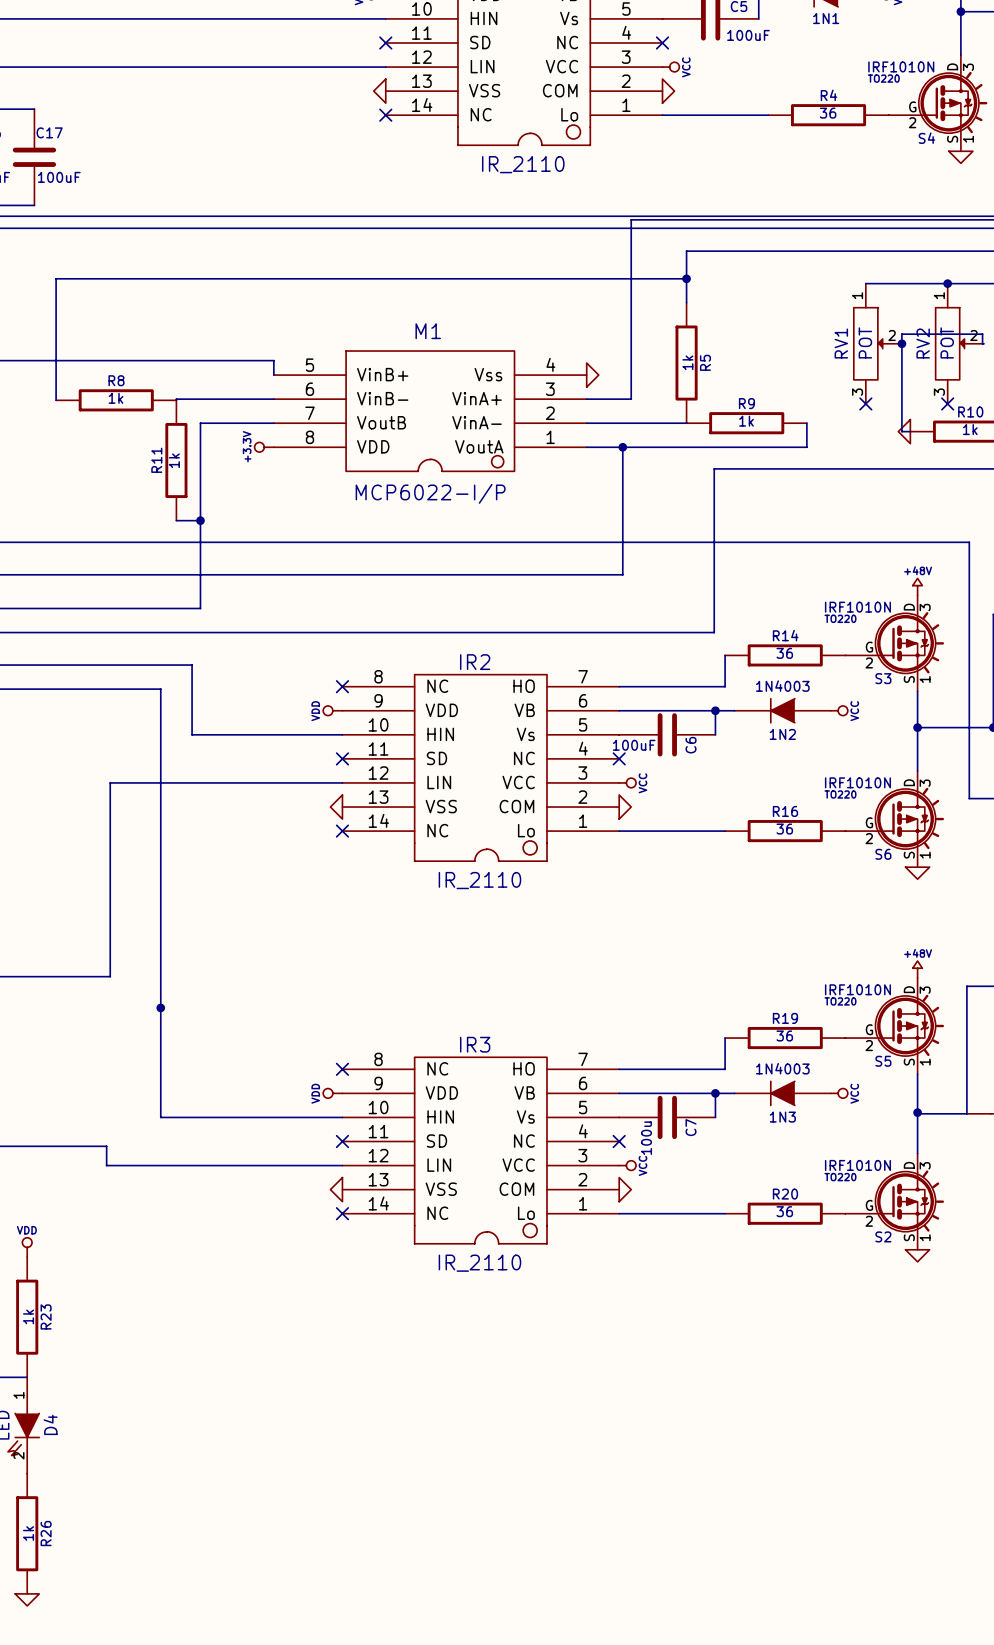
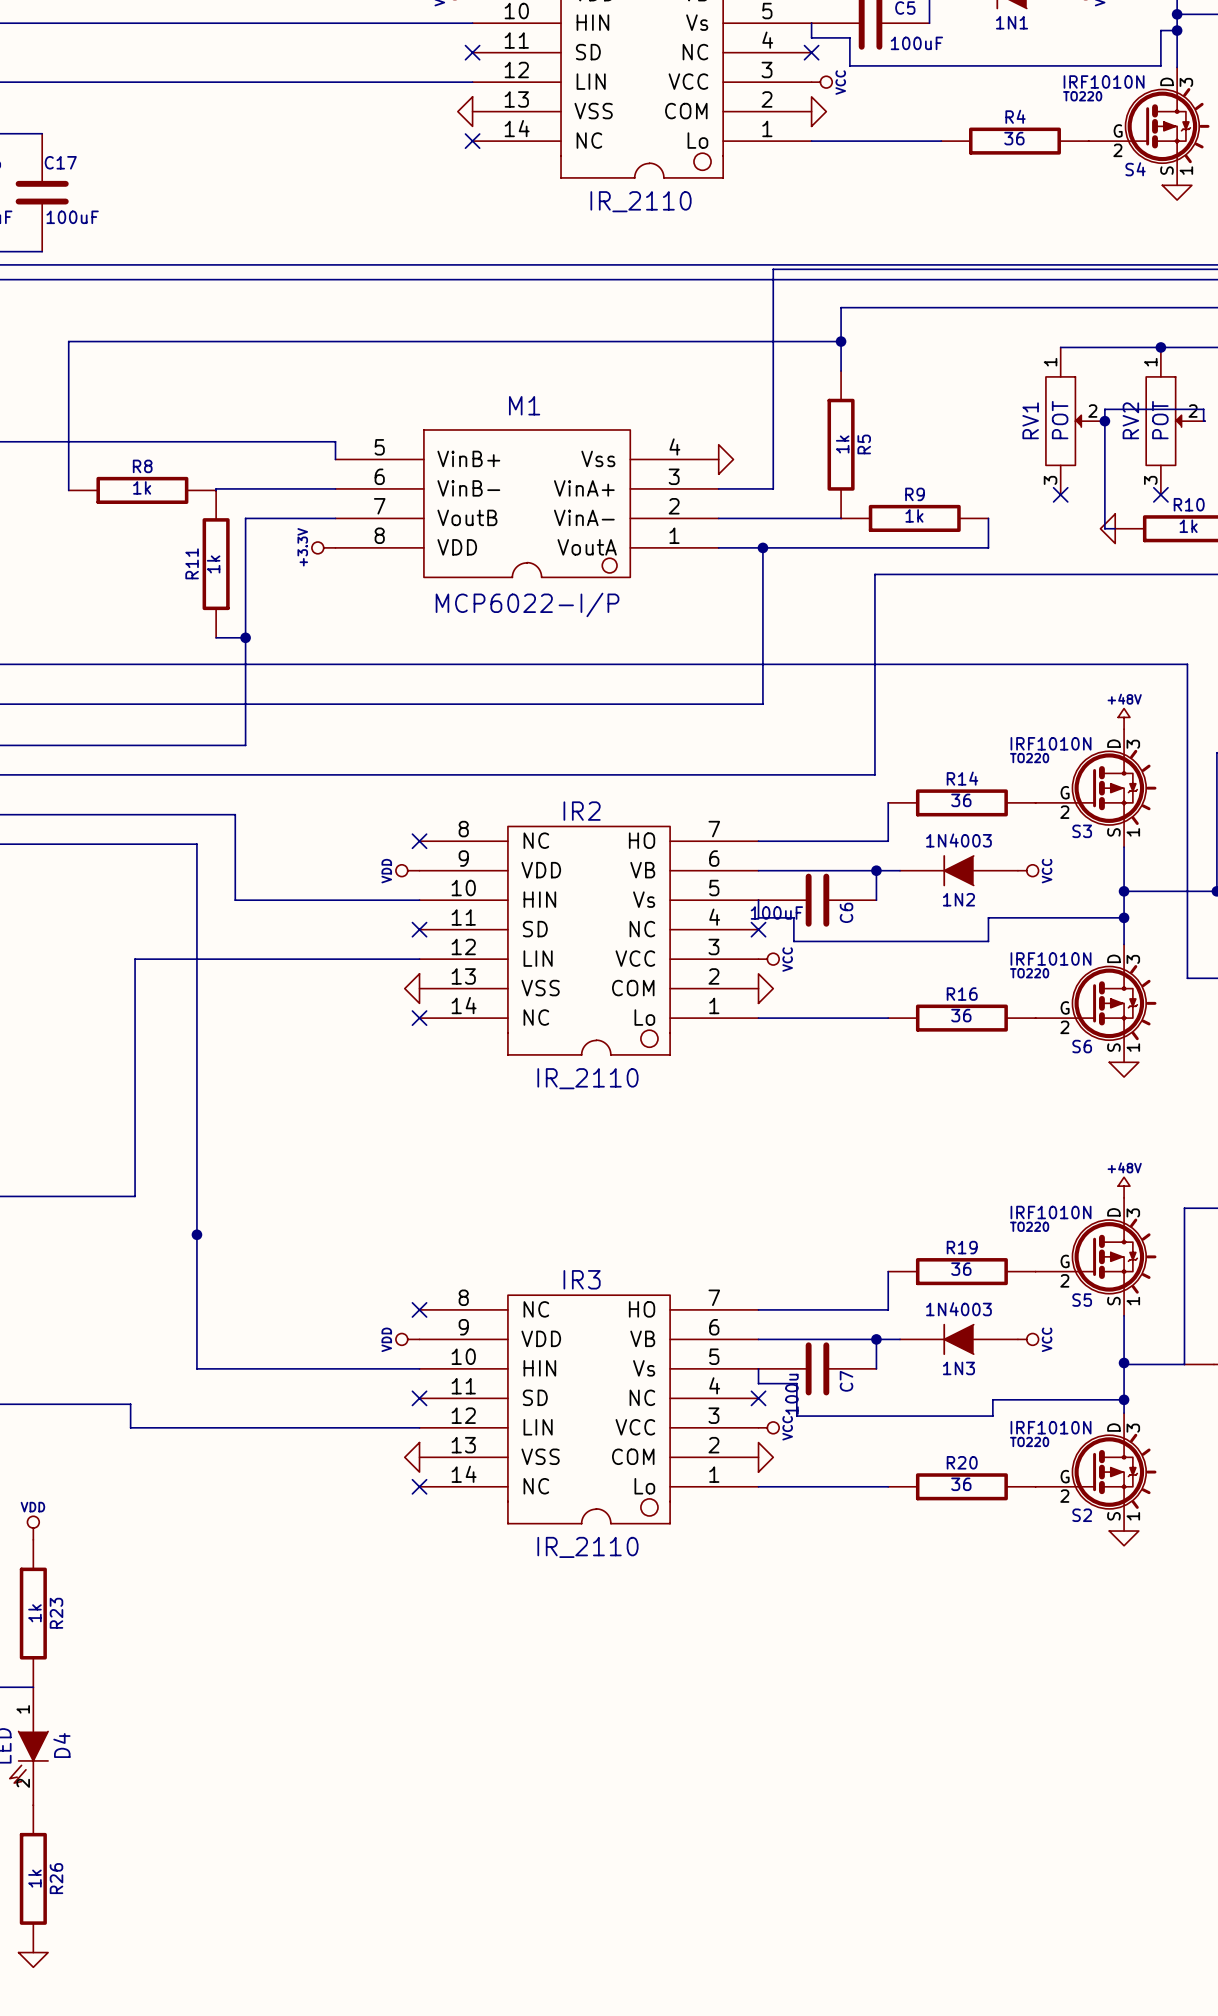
wire: none -> (811, 23) (811, 37) (849, 37) (849, 65) (1160, 65) (1160, 30) (1177, 30)
junction: none -> (1177, 30)
wire: none -> (758, 900) (758, 917) (793, 917) (793, 941) (988, 941) (988, 917) (1124, 917)
junction: none -> (1124, 917)
wire: none -> (758, 1368) (758, 1383) (796, 1383) (796, 1416) (992, 1416) (992, 1399) (1124, 1399)
junction: none -> (1124, 1399)

